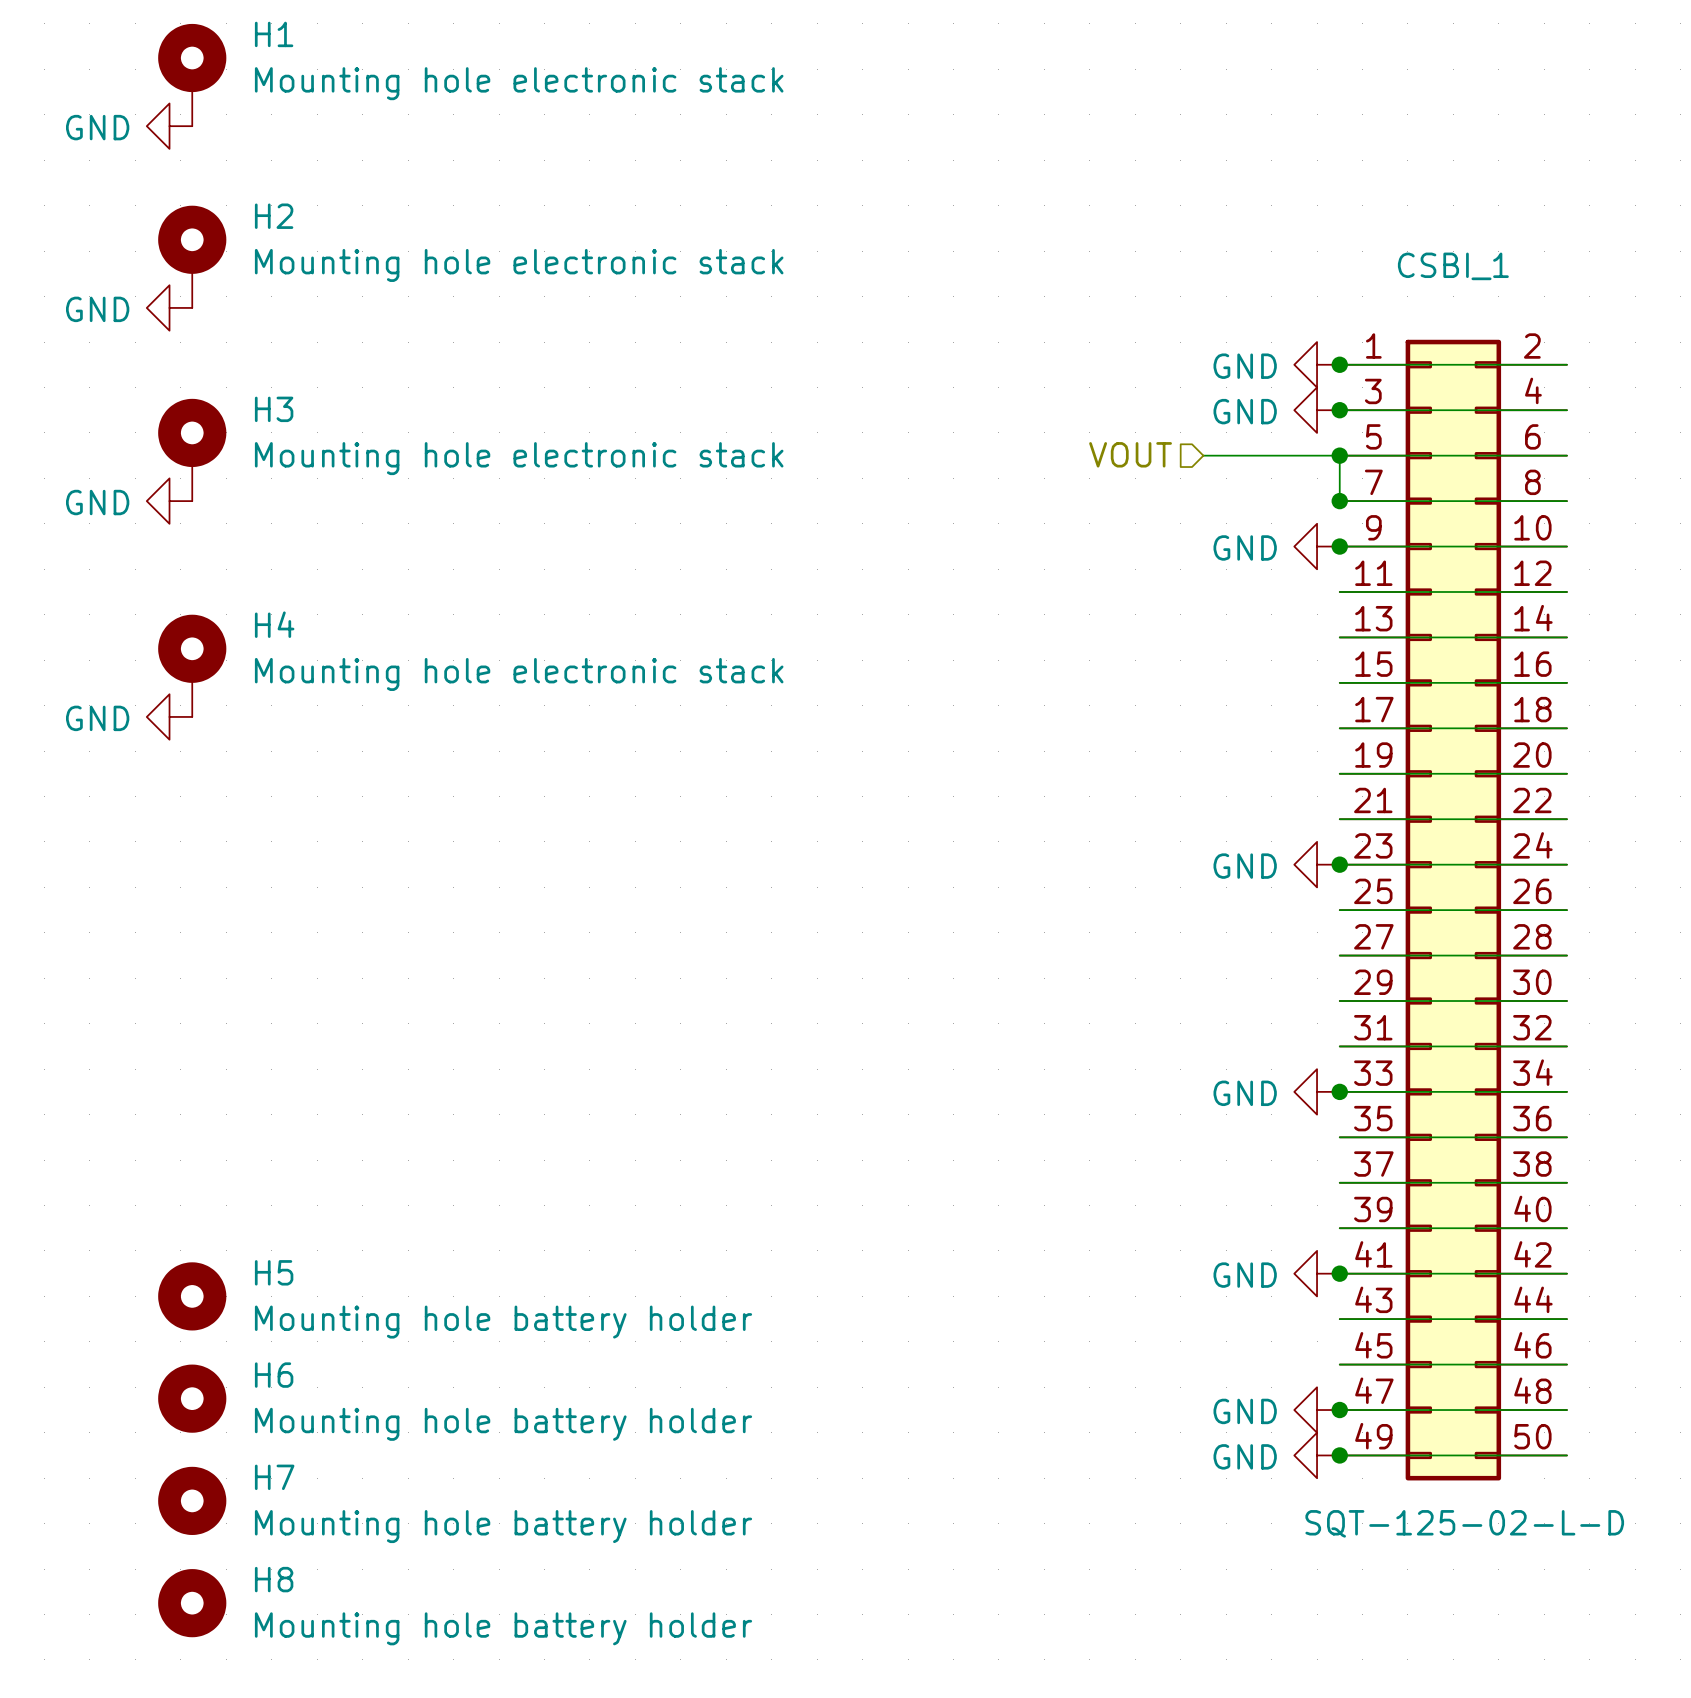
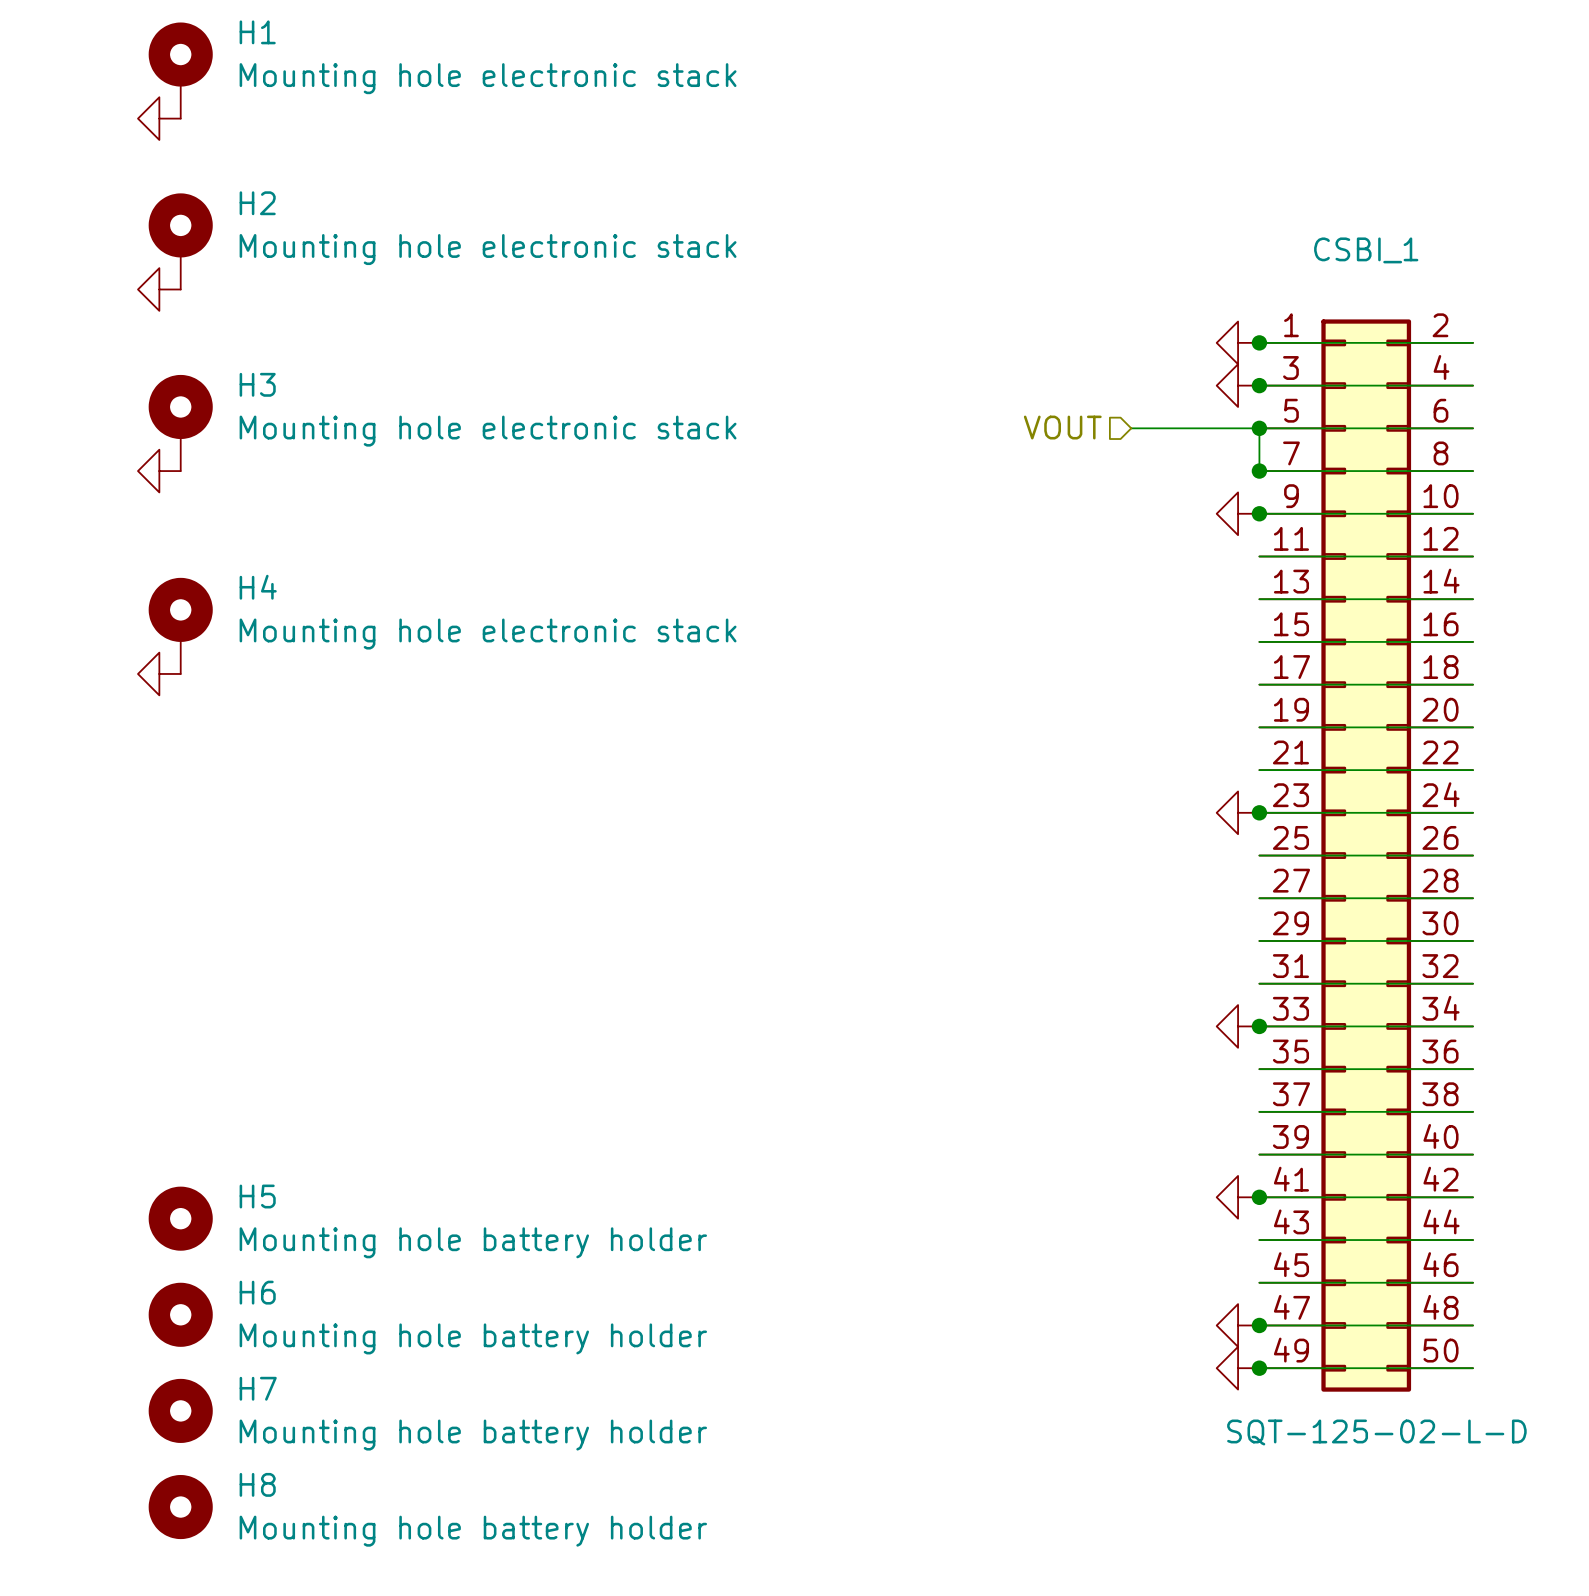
power symbol text: GND (97, 127) -> none
power symbol text: GND (97, 309) -> none
power symbol text: GND (1245, 366) -> none
power symbol text: GND (1245, 411) -> none
power symbol text: GND (97, 502) -> none
power symbol text: GND (1245, 547) -> none
power symbol text: GND (97, 718) -> none
power symbol text: GND (1245, 866) -> none
power symbol text: GND (1245, 1093) -> none
power symbol text: GND (1245, 1275) -> none
power symbol text: GND (1245, 1411) -> none
power symbol text: GND (1245, 1456) -> none

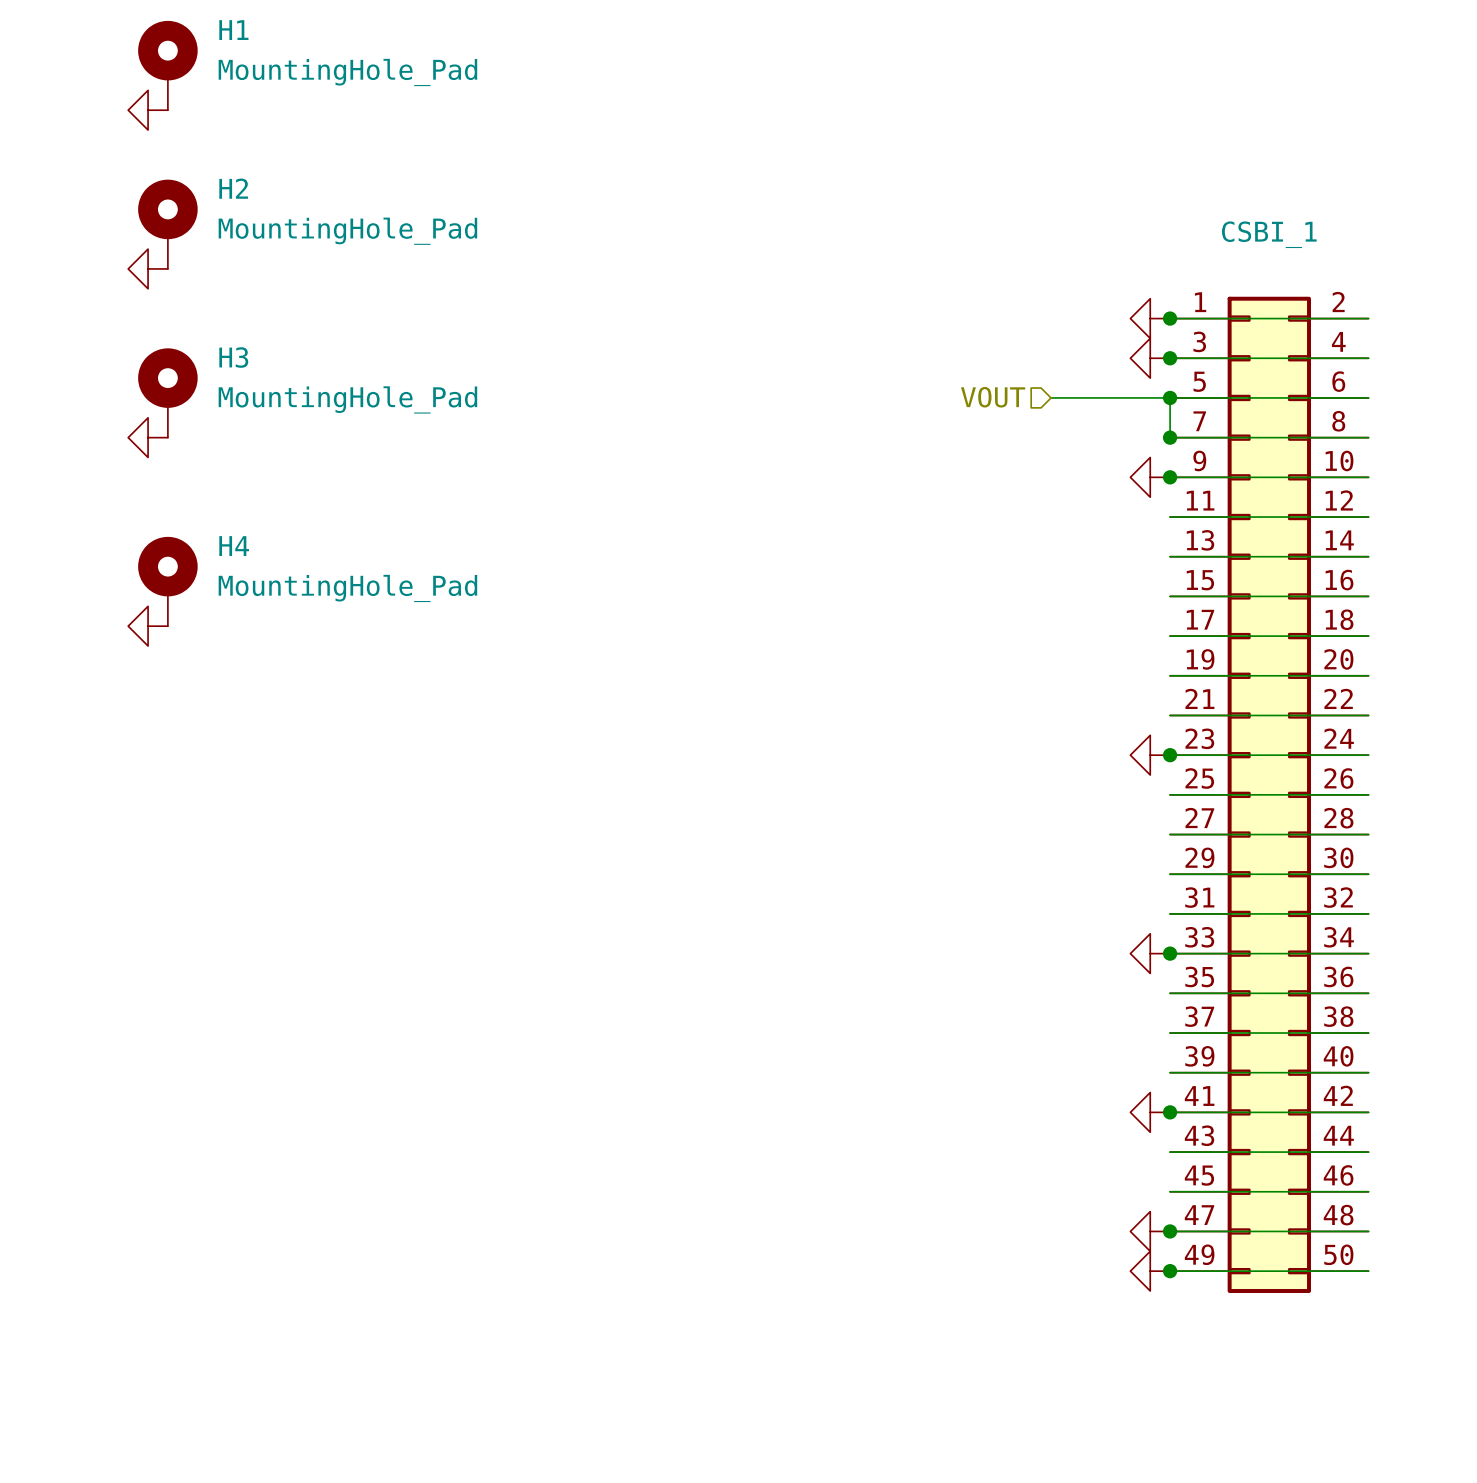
H1 value: Mounting hole electronic stack (488, 78) -> MountingHole_Pad (347, 72)
H2 value: Mounting hole electronic stack (488, 249) -> MountingHole_Pad (347, 231)
H3 value: Mounting hole electronic stack (488, 431) -> MountingHole_Pad (347, 399)
H4 value: Mounting hole electronic stack (488, 634) -> MountingHole_Pad (347, 588)
H5: Mounting hole battery holder (180, 1218) -> none
H6: Mounting hole battery holder (180, 1314) -> none
H7: Mounting hole battery holder (180, 1410) -> none
CSBI_1 text: SQT-125-02-L-D (1376, 1432) -> none
H8: Mounting hole battery holder (180, 1507) -> none

